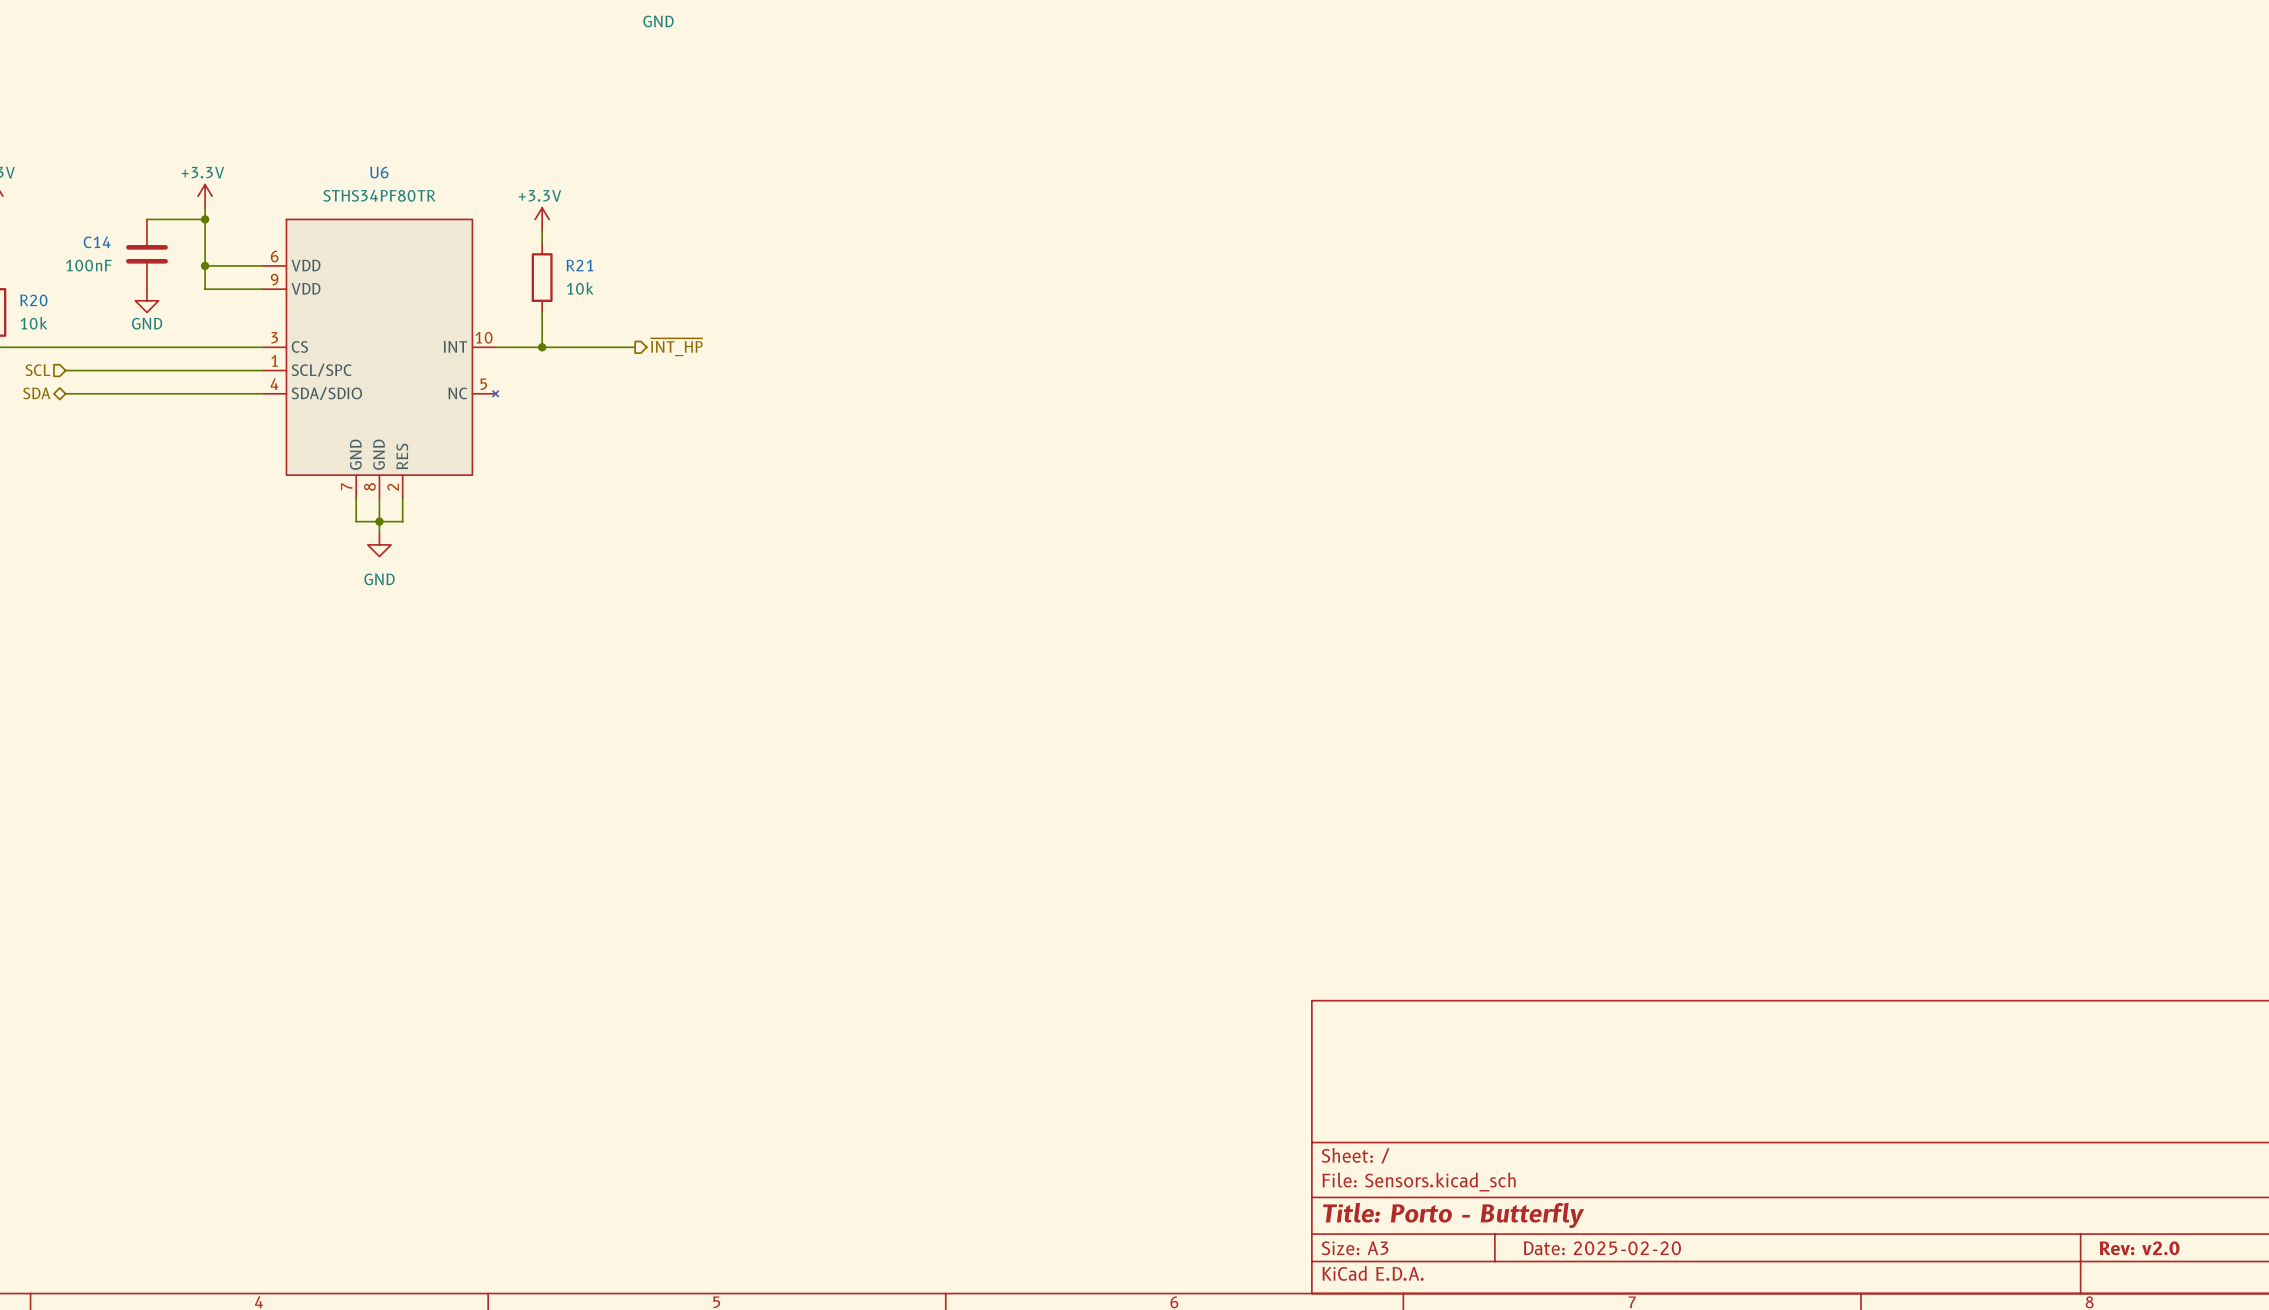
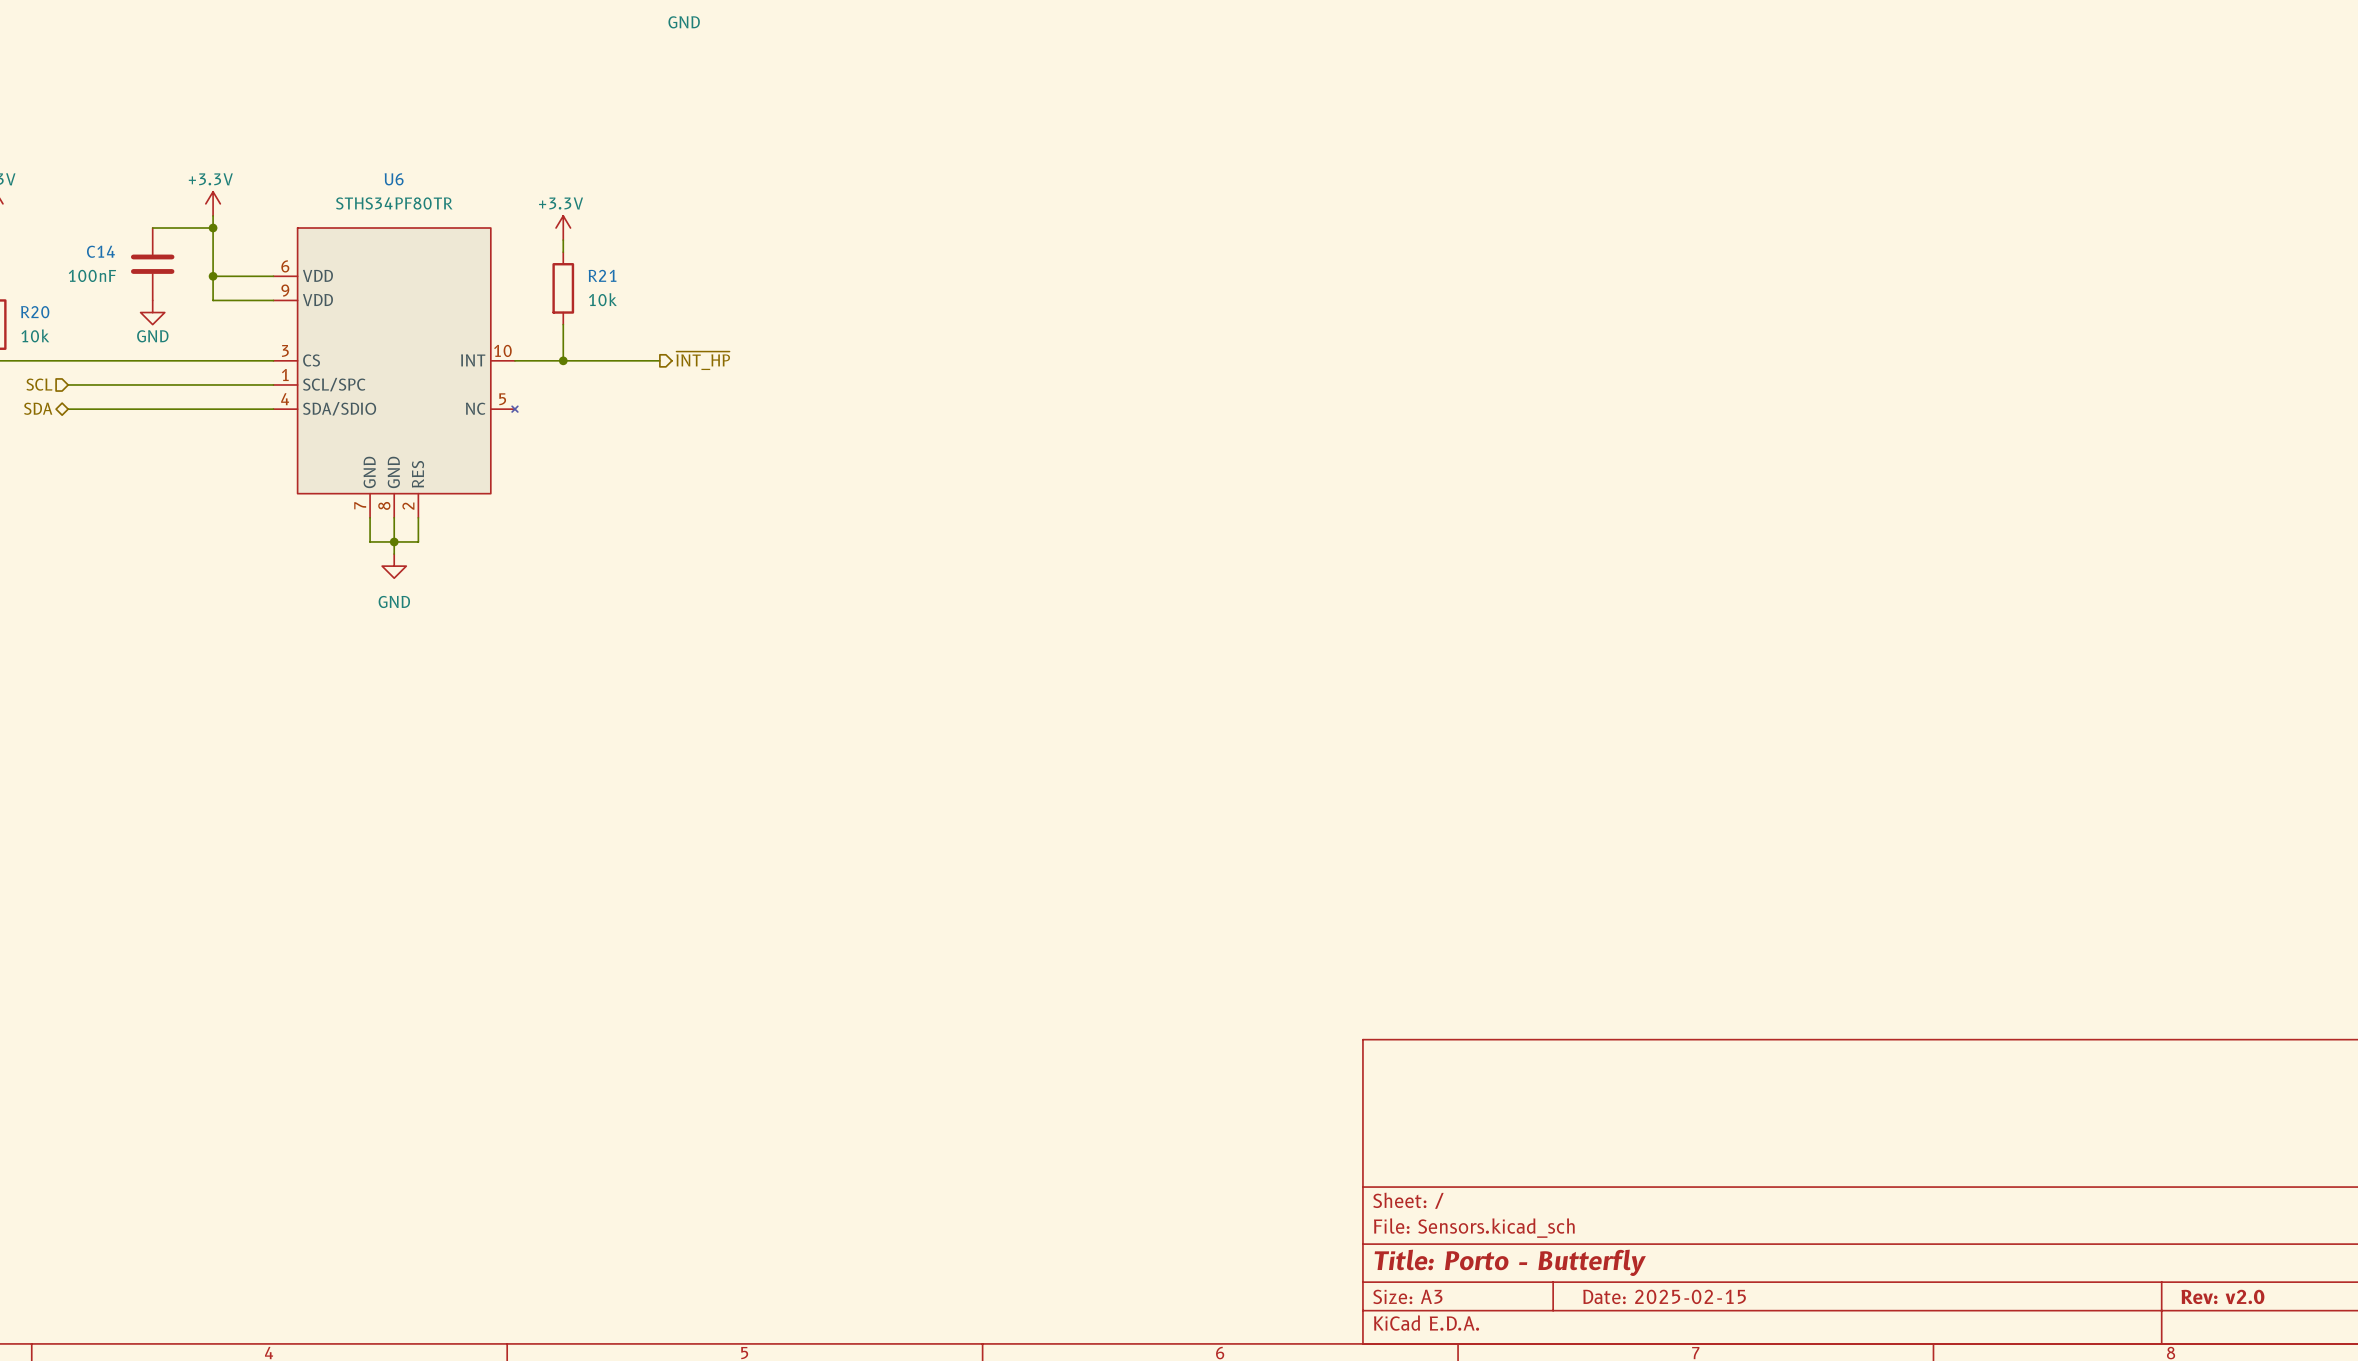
title block: Date: 2025-02-20 (1602, 1248) -> Date: 2025-02-15 (1664, 1296)

